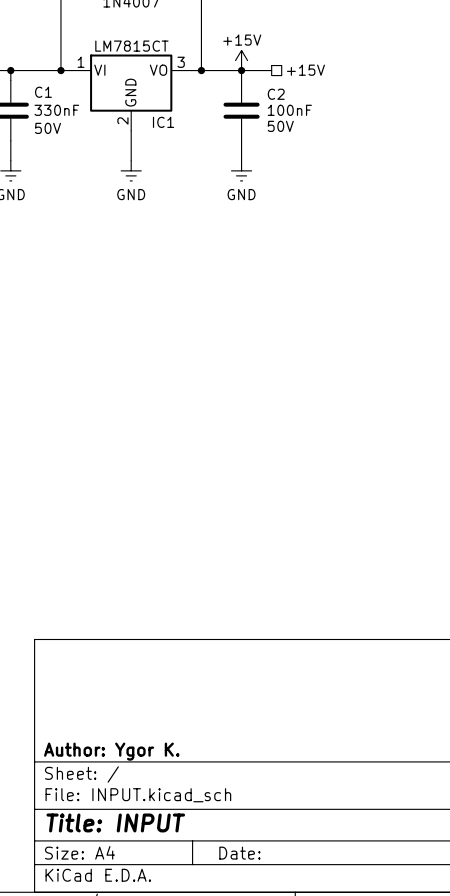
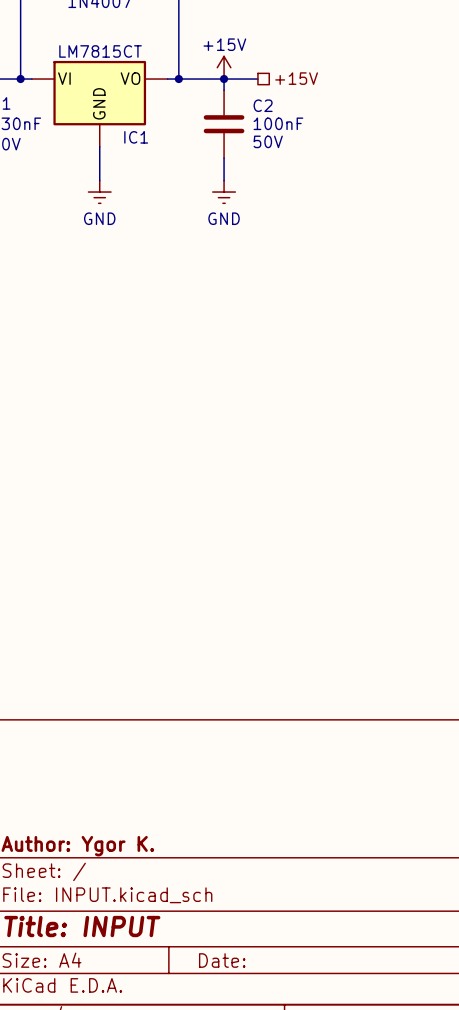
IC1 pin number: 1 (81, 62) -> none
IC1 pin number: 3 (181, 62) -> none
IC1 pin number: 2 (122, 120) -> none

